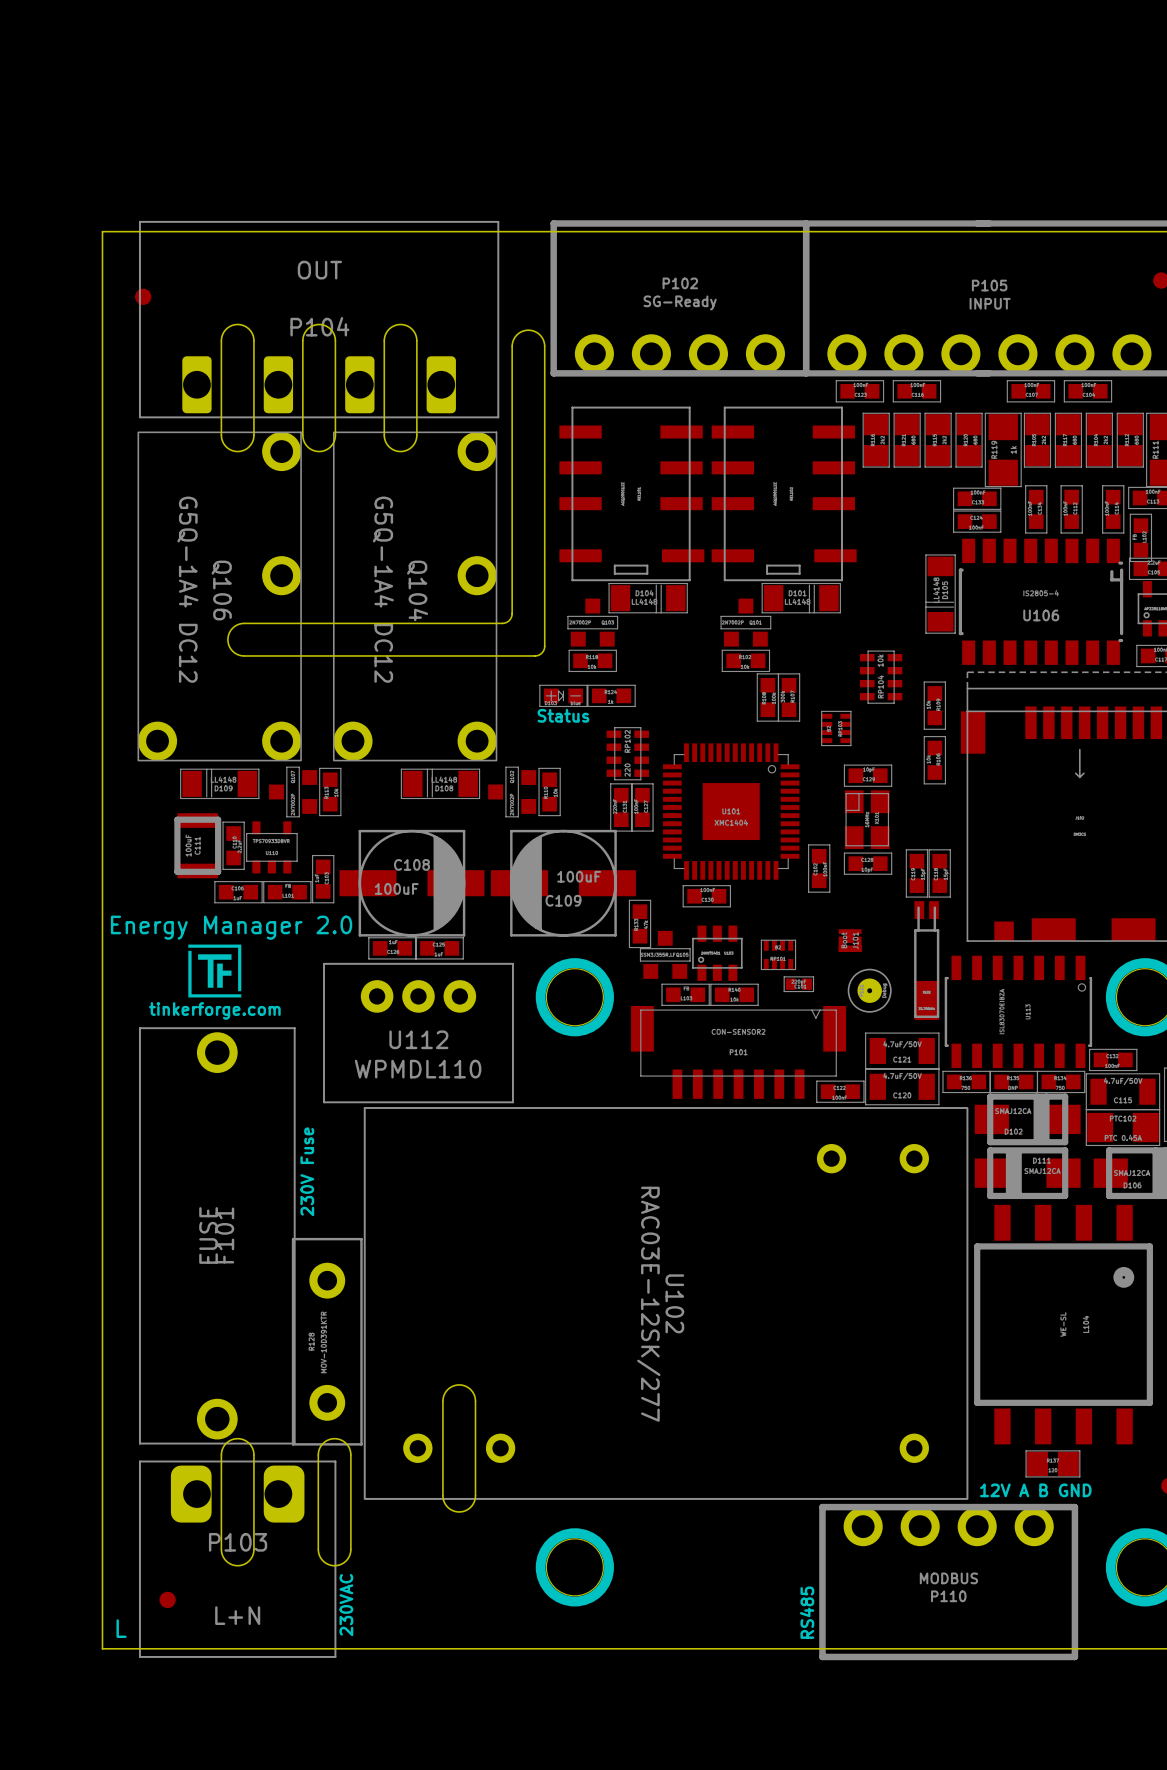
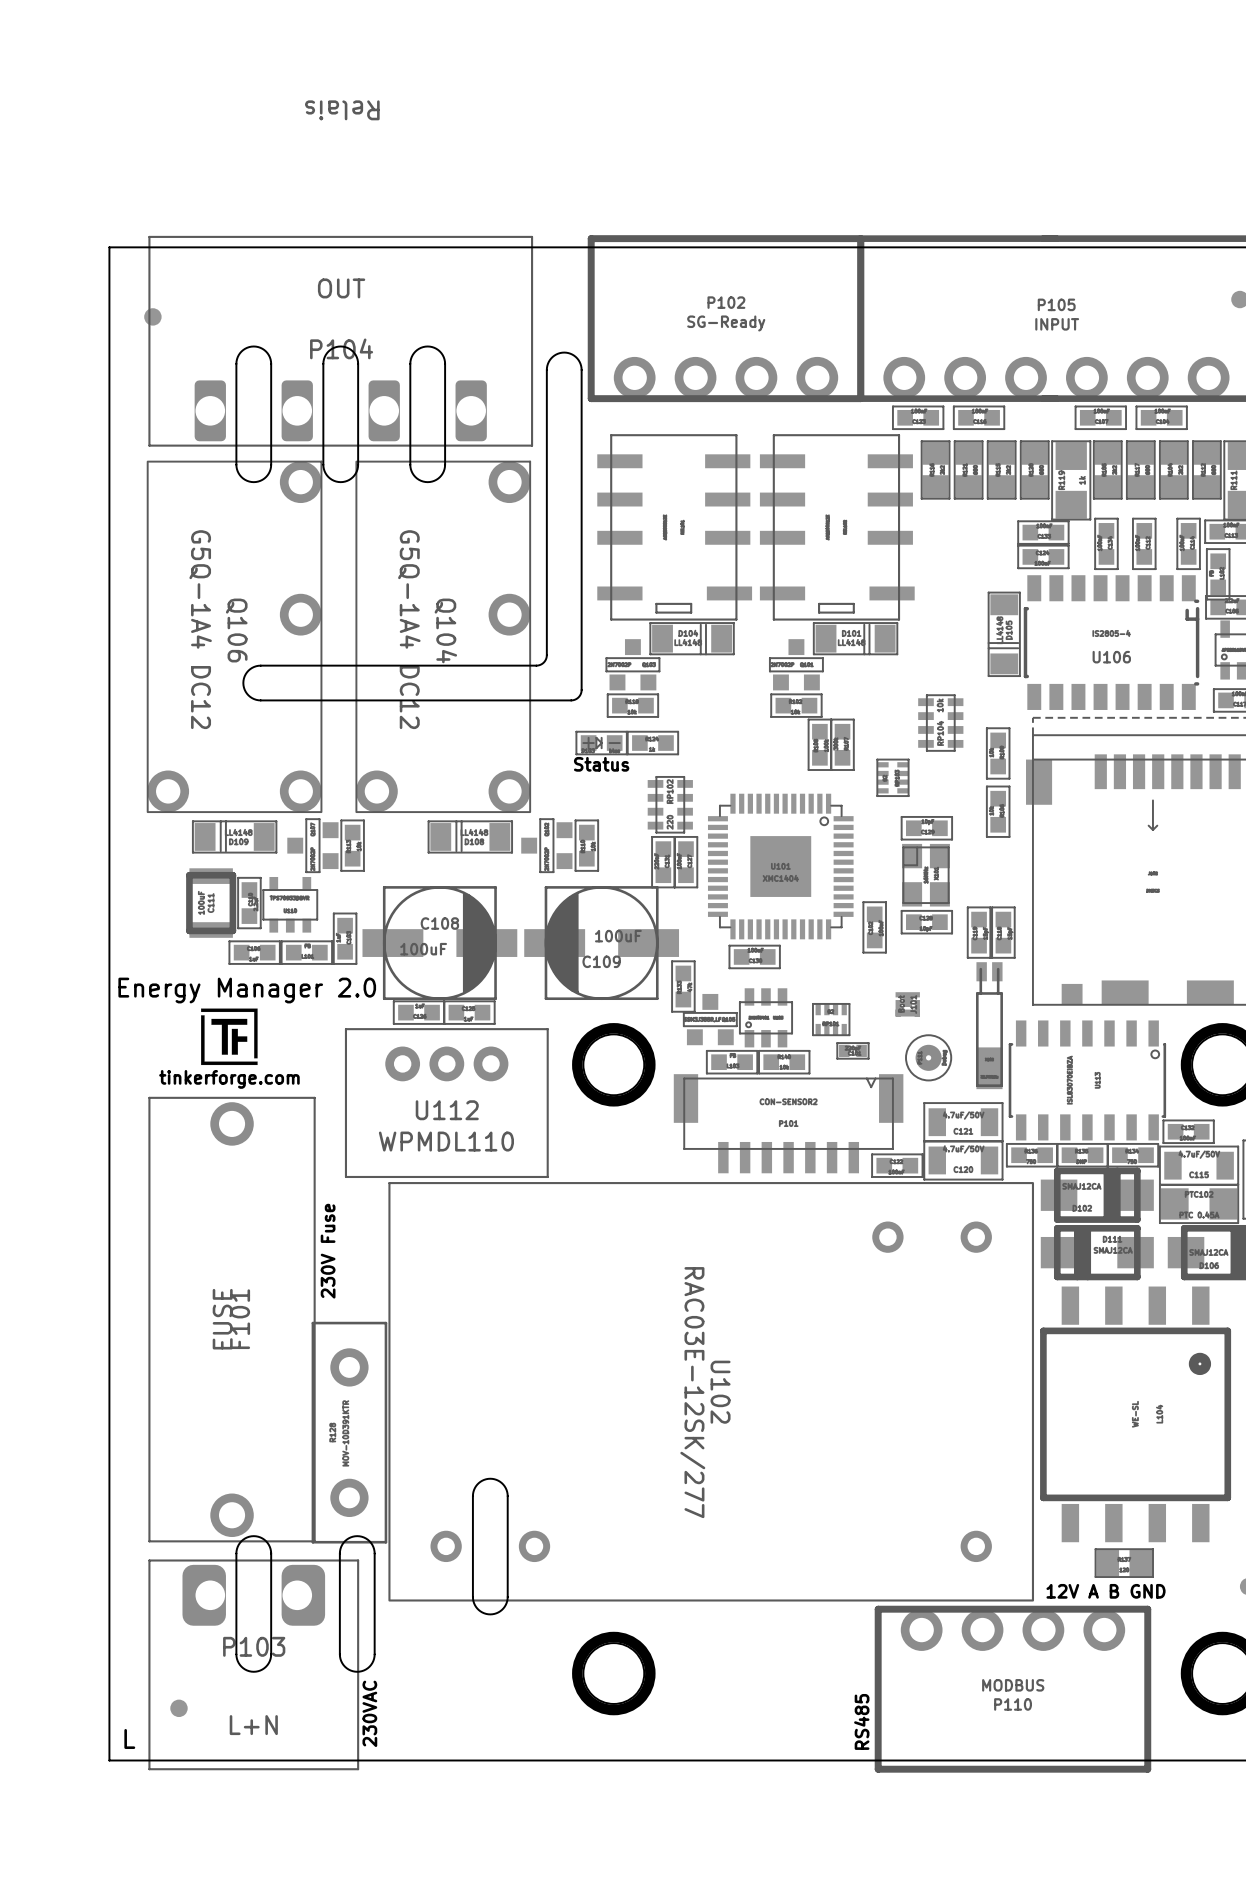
text: none -> Relais (342, 110)

